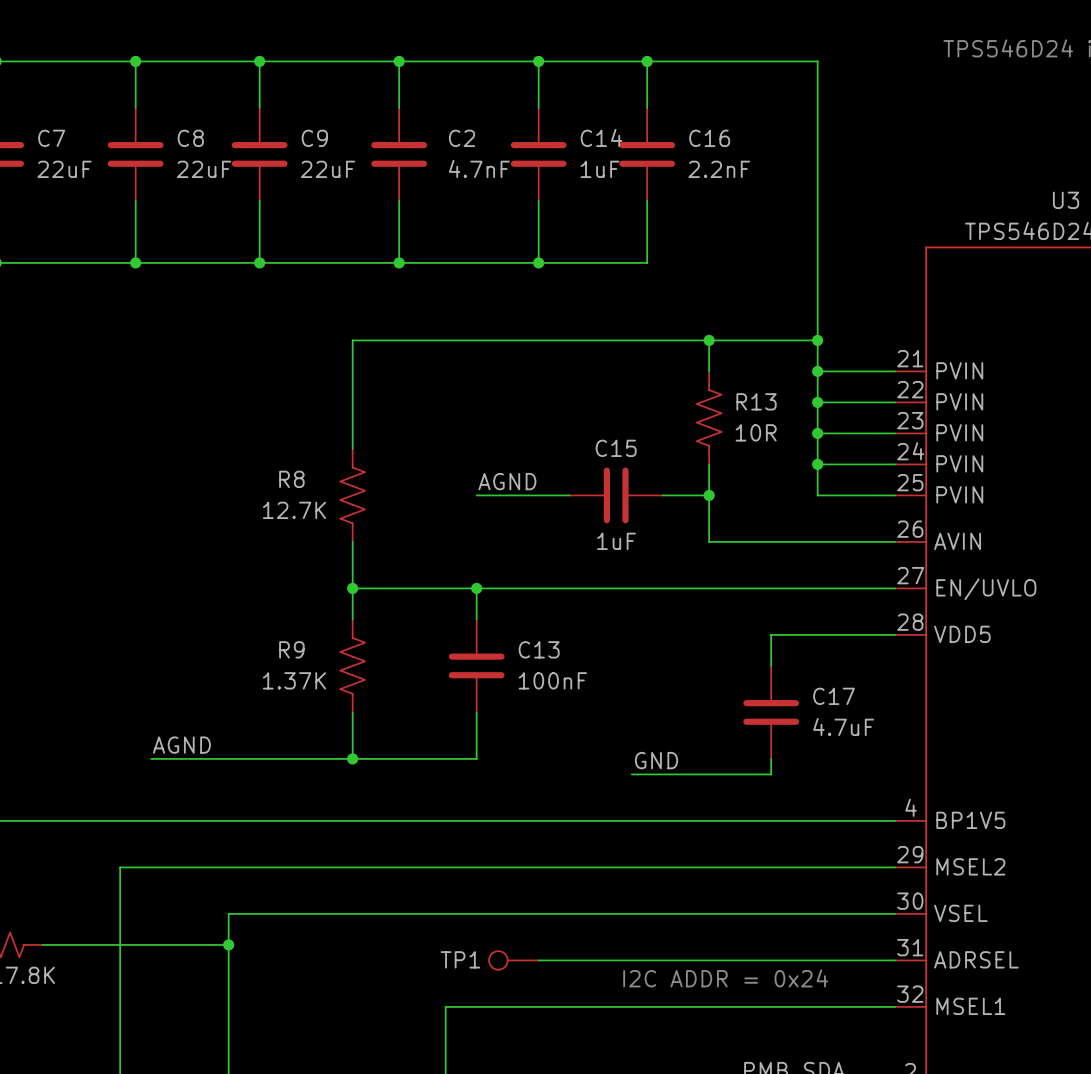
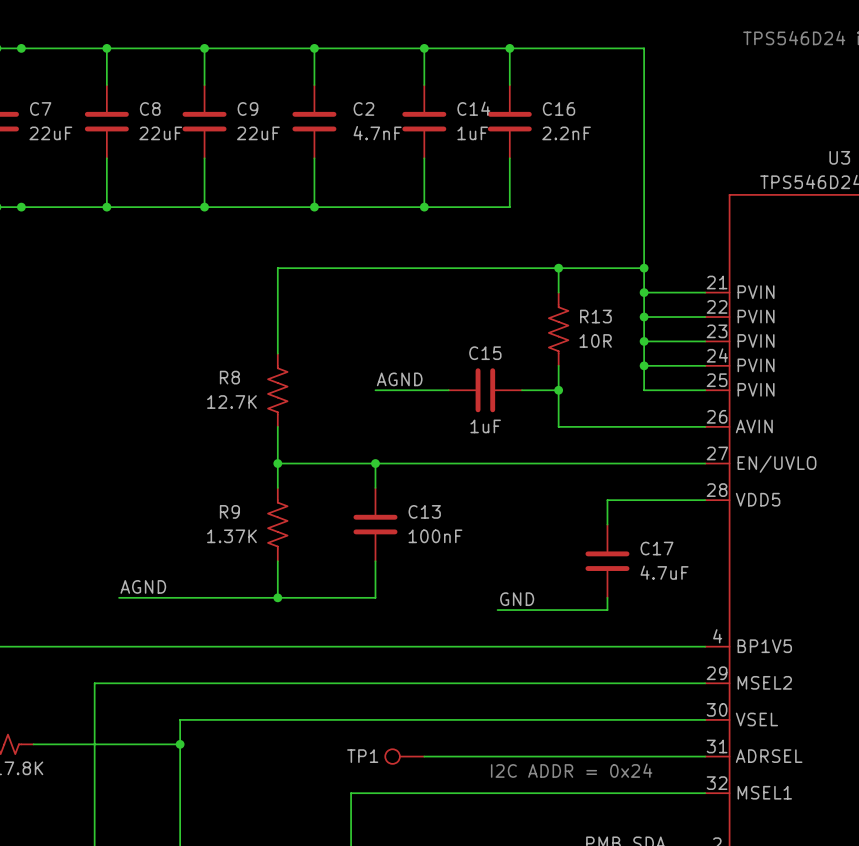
junction: none -> (21, 48)
junction: none -> (21, 207)

